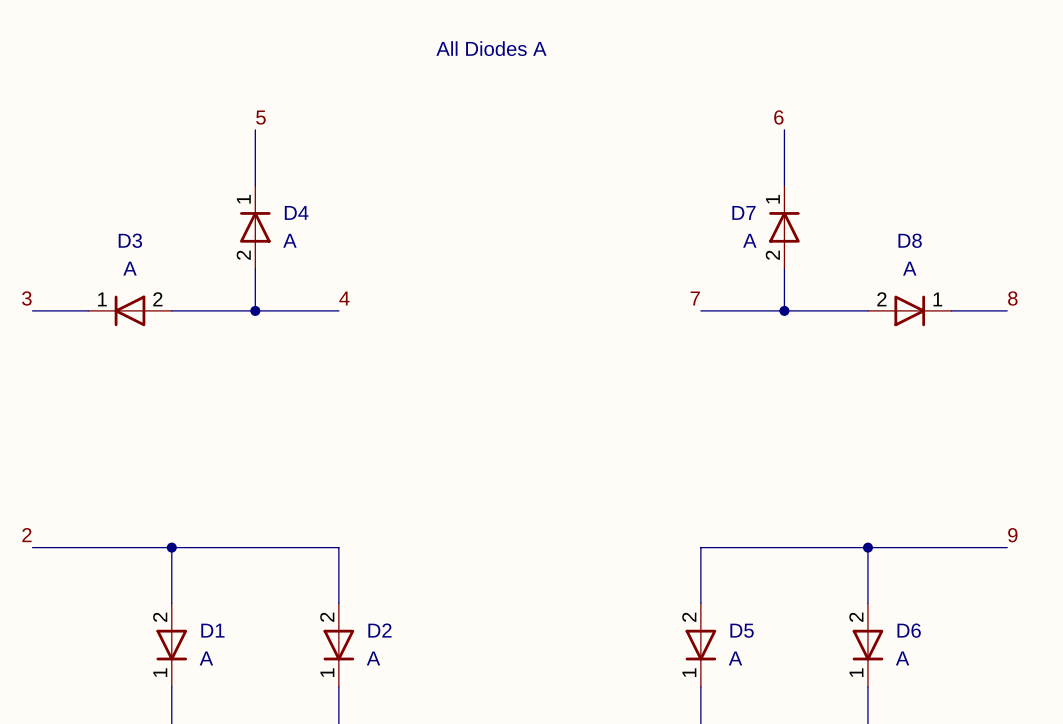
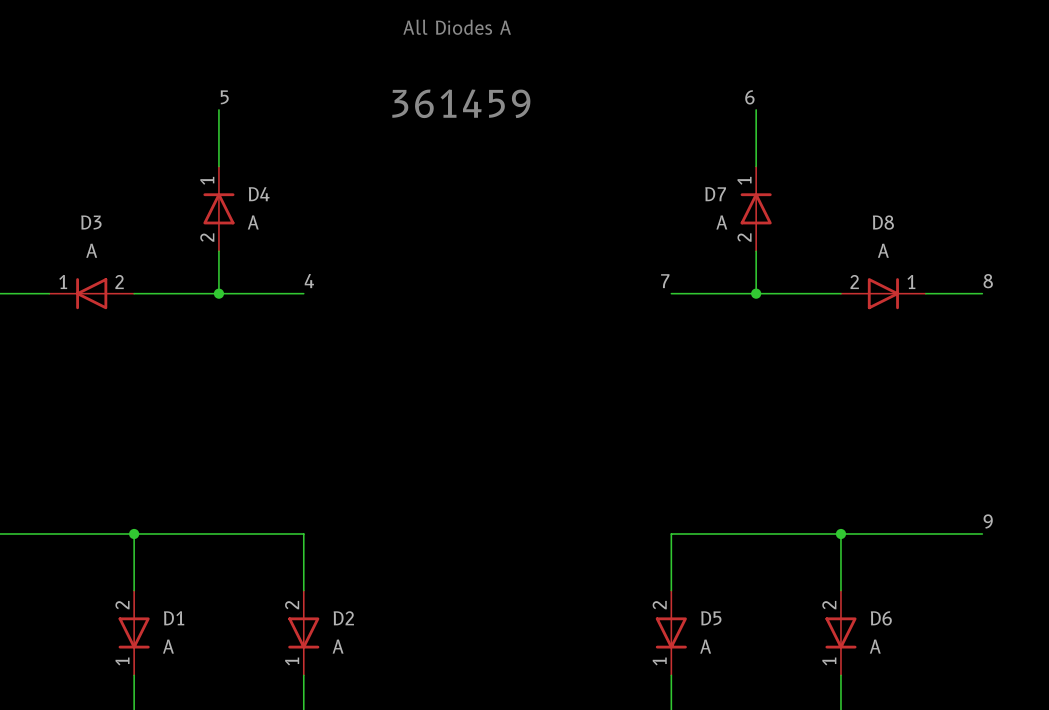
text: none -> 361459 (461, 103)

